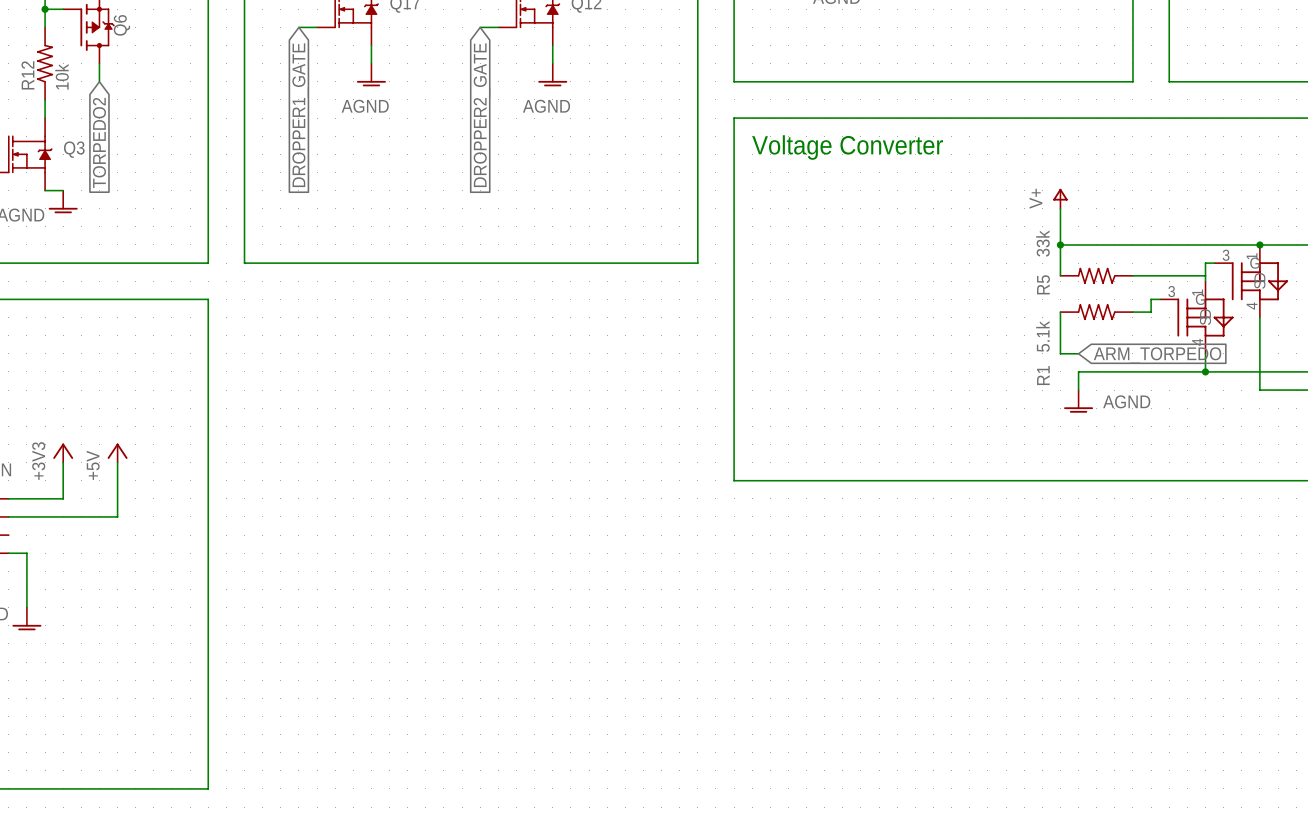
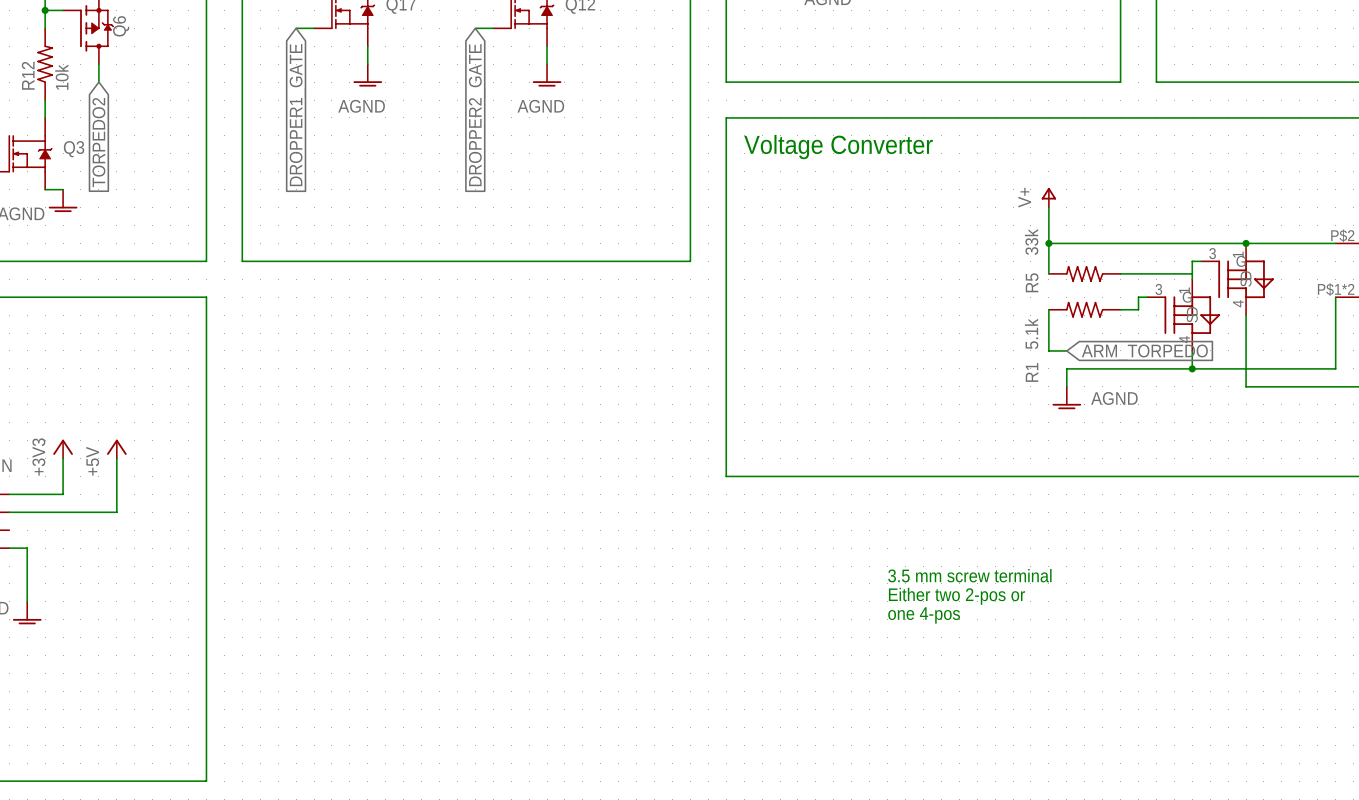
text: none -> 3.5 mm screw terminal (969, 575)
text: none -> Either two 2-pos or (956, 596)
text: none -> one 4-pos (924, 615)

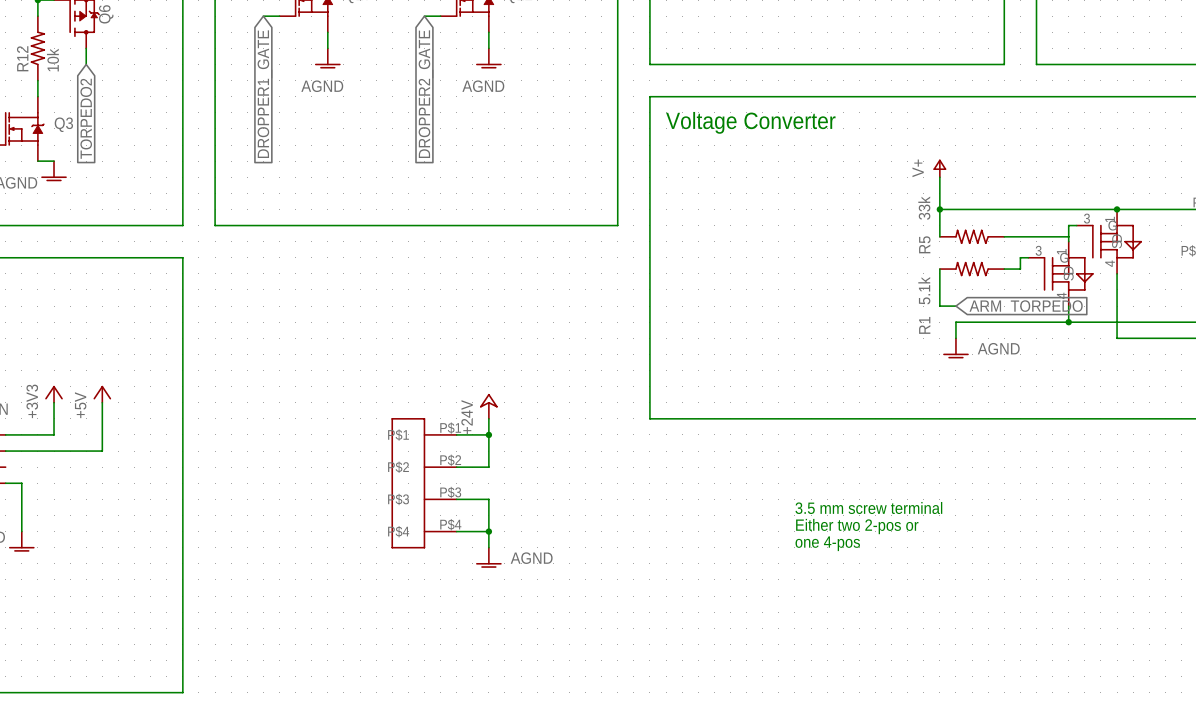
power symbol: none -> +24V (488, 406)
wire: none -> (488, 418) (488, 467) (456, 467)
wire: none -> (456, 434) (488, 434)
junction: none -> (488, 434)
part: none -> (424, 483)
wire: none -> (456, 499) (488, 499) (488, 547)
wire: none -> (456, 531) (488, 531)
junction: none -> (488, 531)
power symbol: none -> AGND (488, 557)

